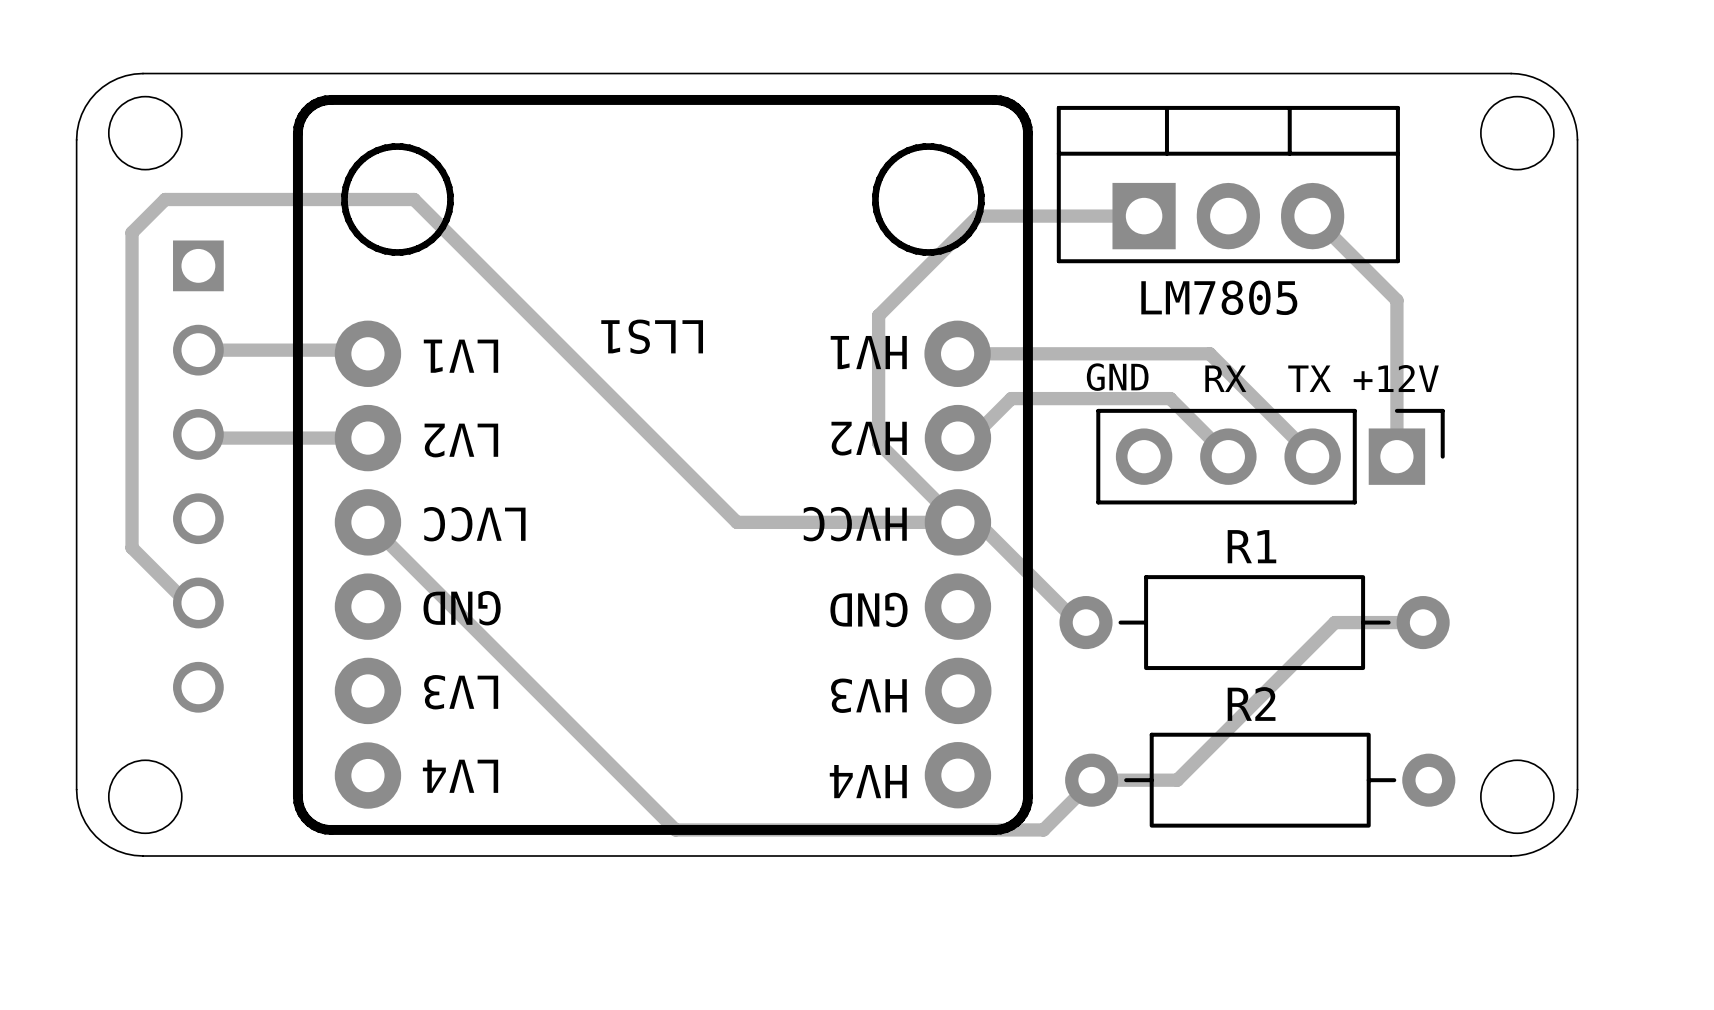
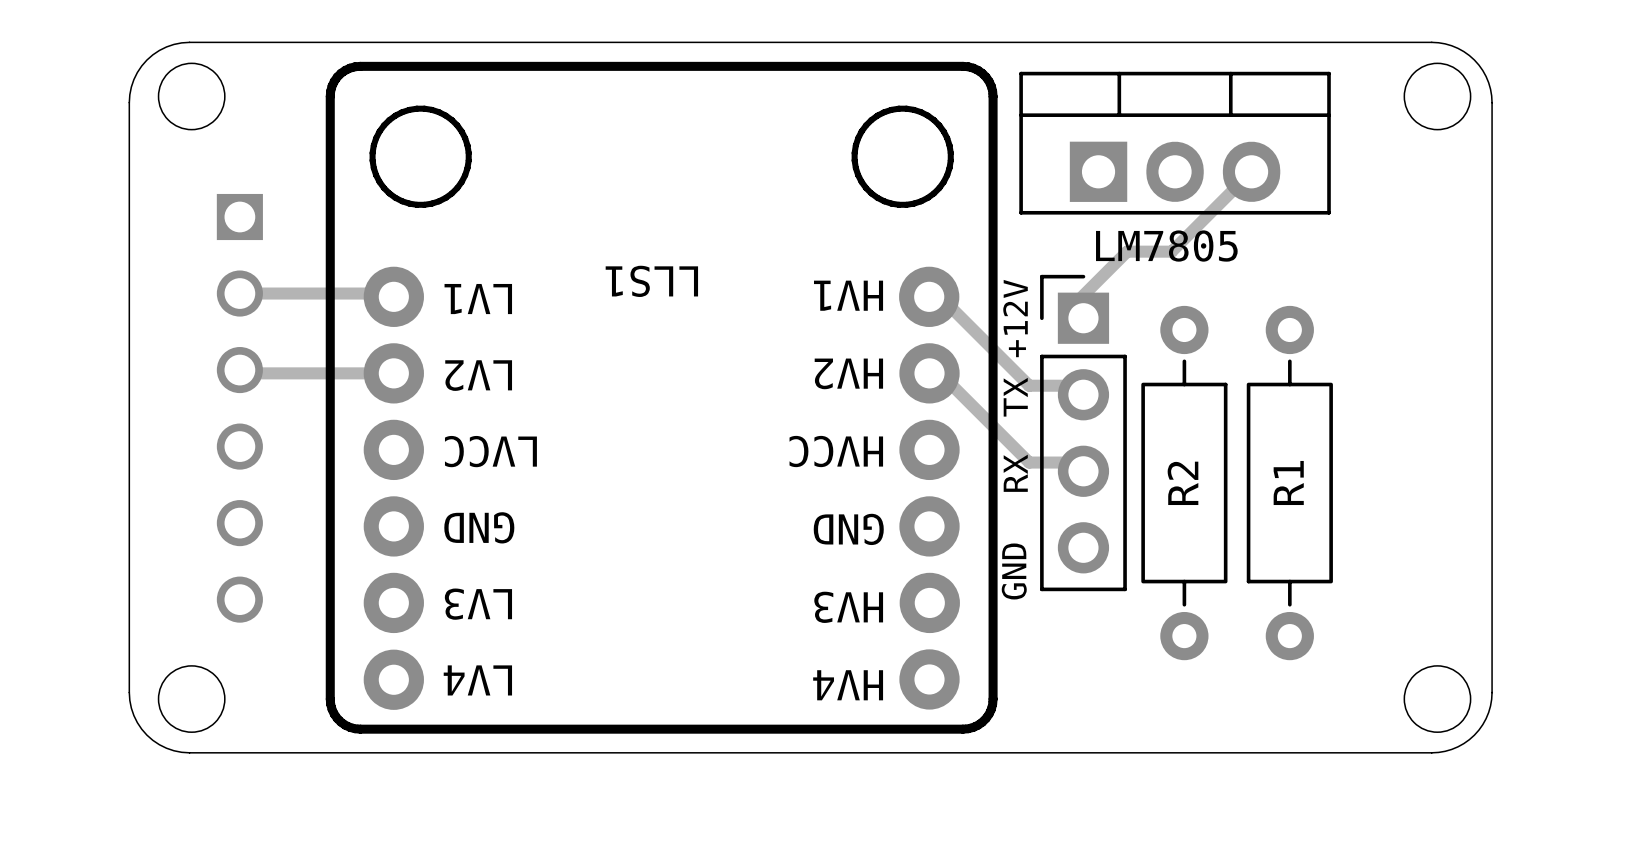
track: (1144, 216) (978, 216) (878, 315) (878, 443) (957, 522) (736, 522) (414, 199) (165, 199) (132, 232) (132, 547) (187, 602) -> none
track: (1312, 216) (1396, 300) (1396, 456) -> (1251, 171) (1171, 251) (1127, 251) (1071, 307)
track: (969, 353) (1209, 353) (1312, 456) -> (940, 296) (1029, 385) (1069, 385) (1071, 383)
track: none -> (929, 373) (940, 373) (1029, 462) (1069, 462) (1071, 460)
track: (971, 438) (1011, 398) (1170, 398) (1228, 456) -> none
part: (1270, 456) -> none
part: none -> (1083, 433)
track: (367, 522) (675, 829) (1043, 829) (1091, 781) -> none
track: (977, 522) (1077, 622) (1086, 622) -> none
R1 rotation: 0° (1254, 622) -> 90° clockwise (1184, 483)
track: (1423, 622) (1334, 622) (1177, 780) (1091, 780) -> none
R2 name position: R2 (1251, 703) -> R2 (1182, 483)
R2 rotation: 0° (1260, 780) -> 90° clockwise (1289, 483)
R2 position: (1260, 780) -> (1289, 483)

